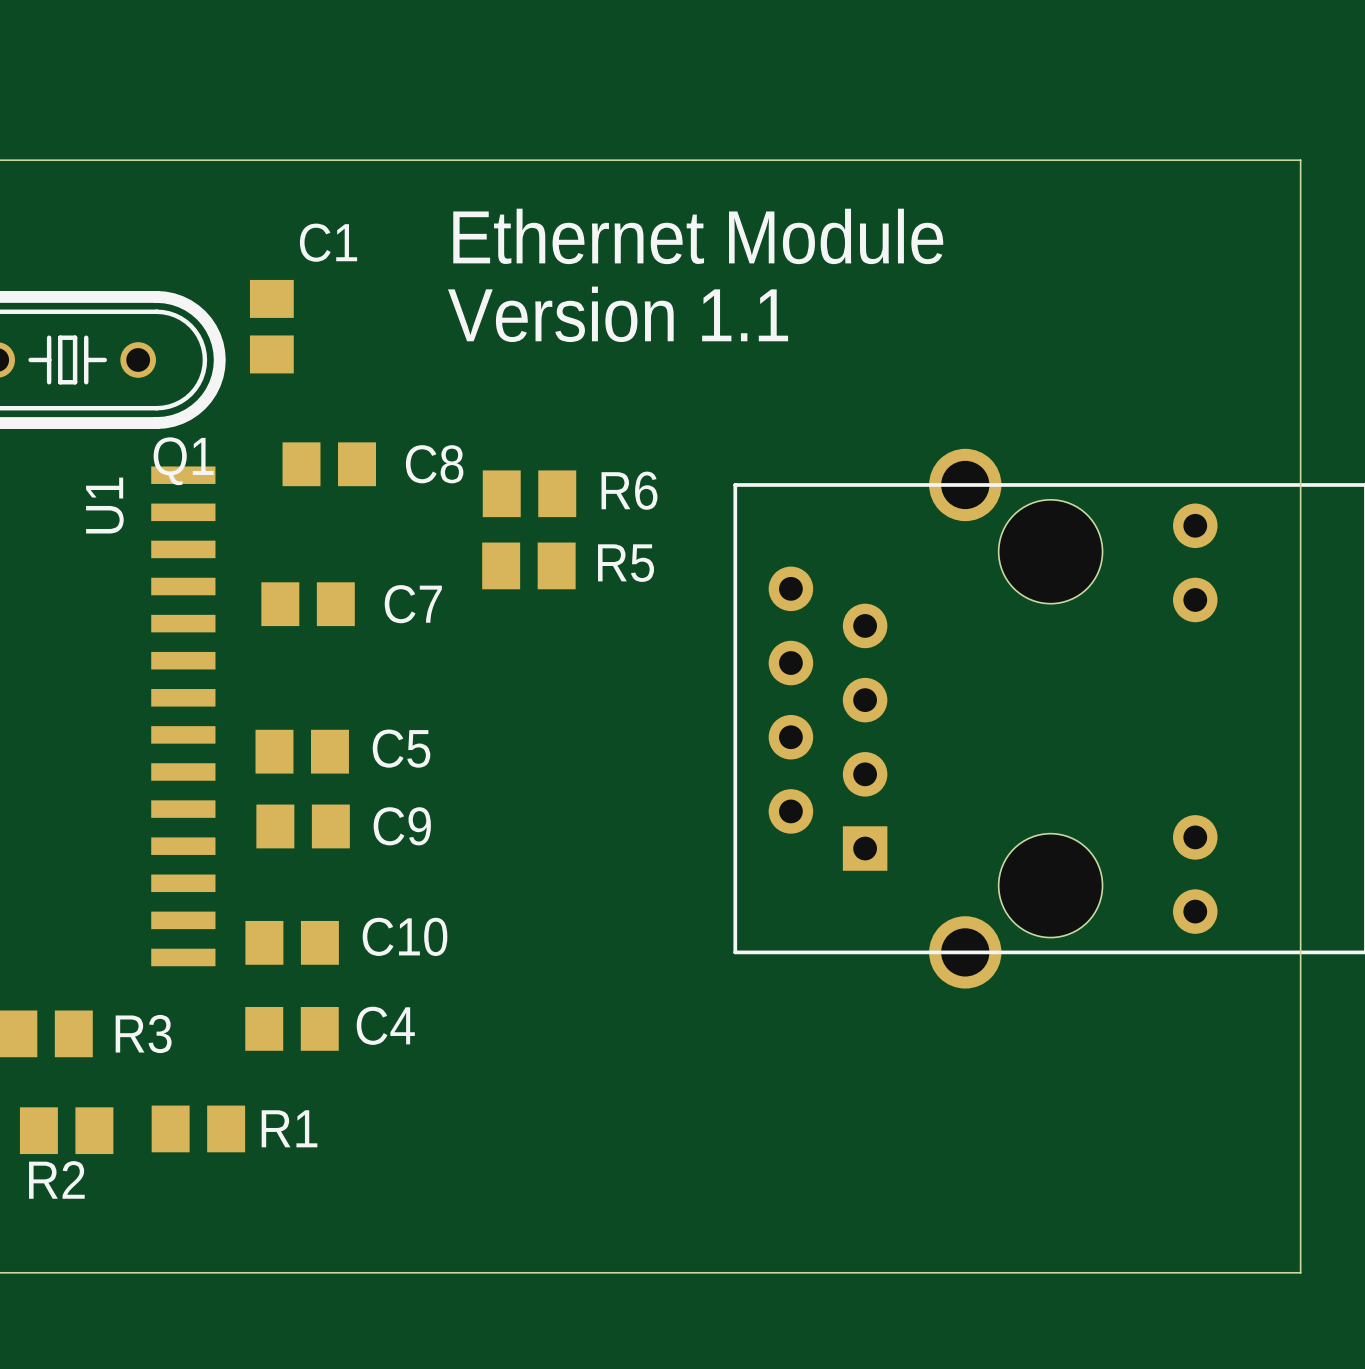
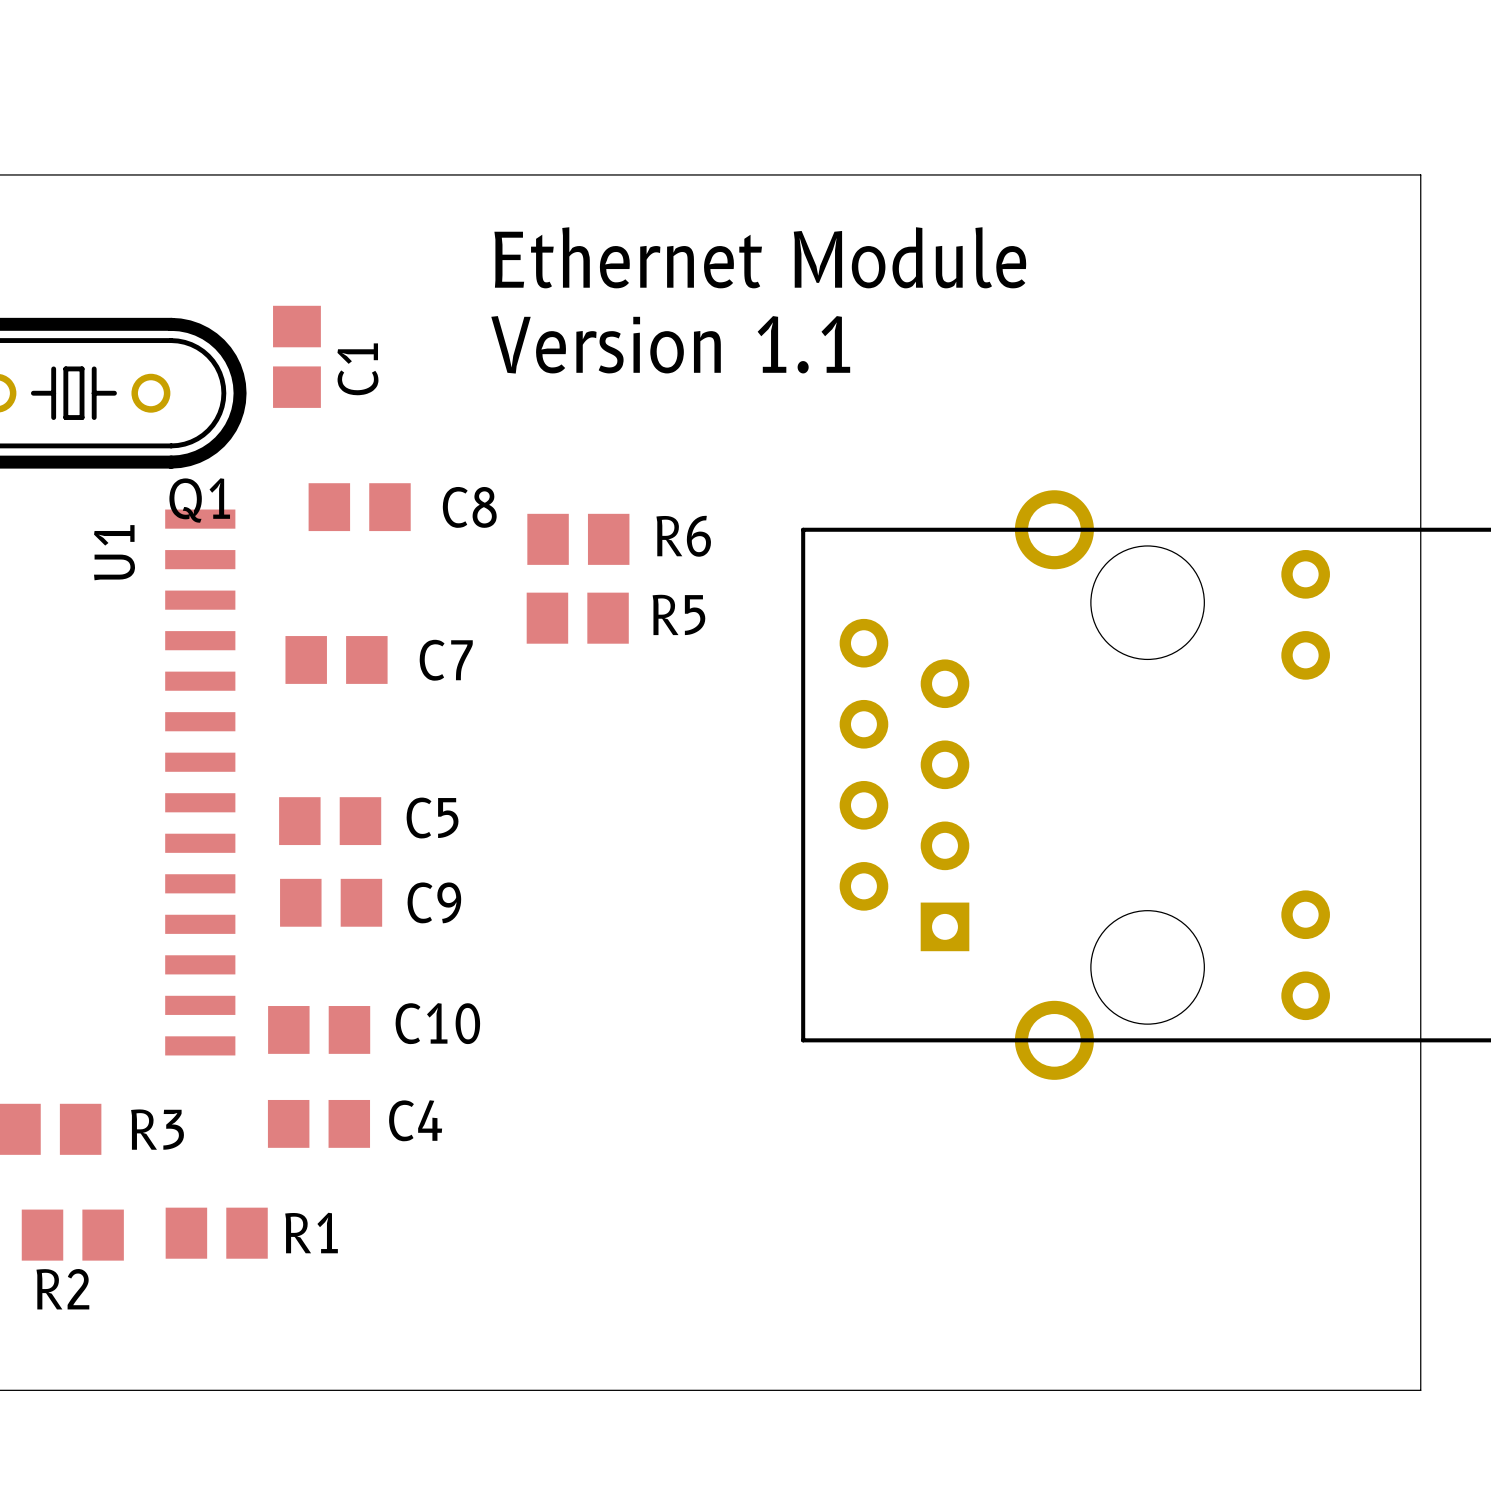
C1 name rotation: 0° (328, 242) -> 90° counterclockwise (357, 369)

